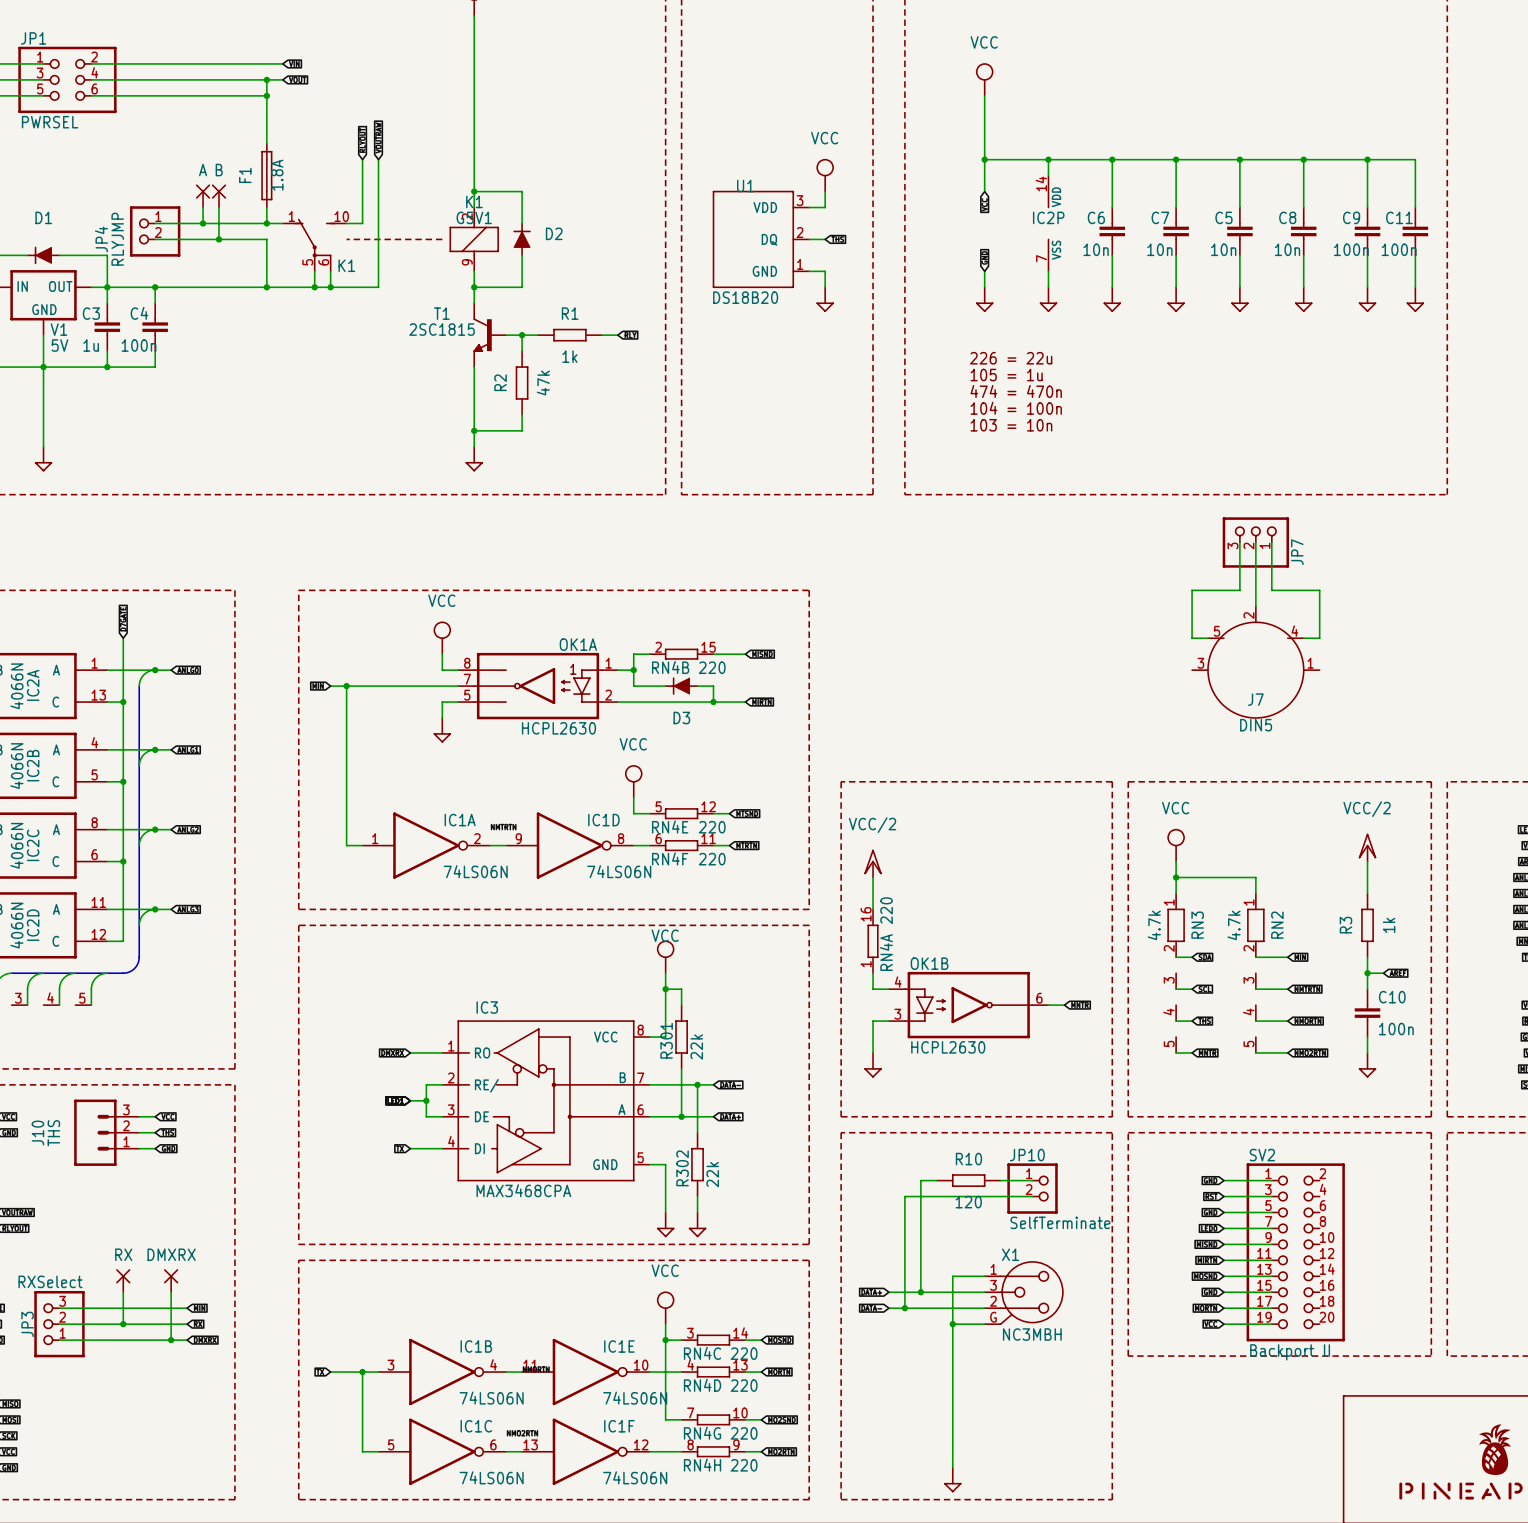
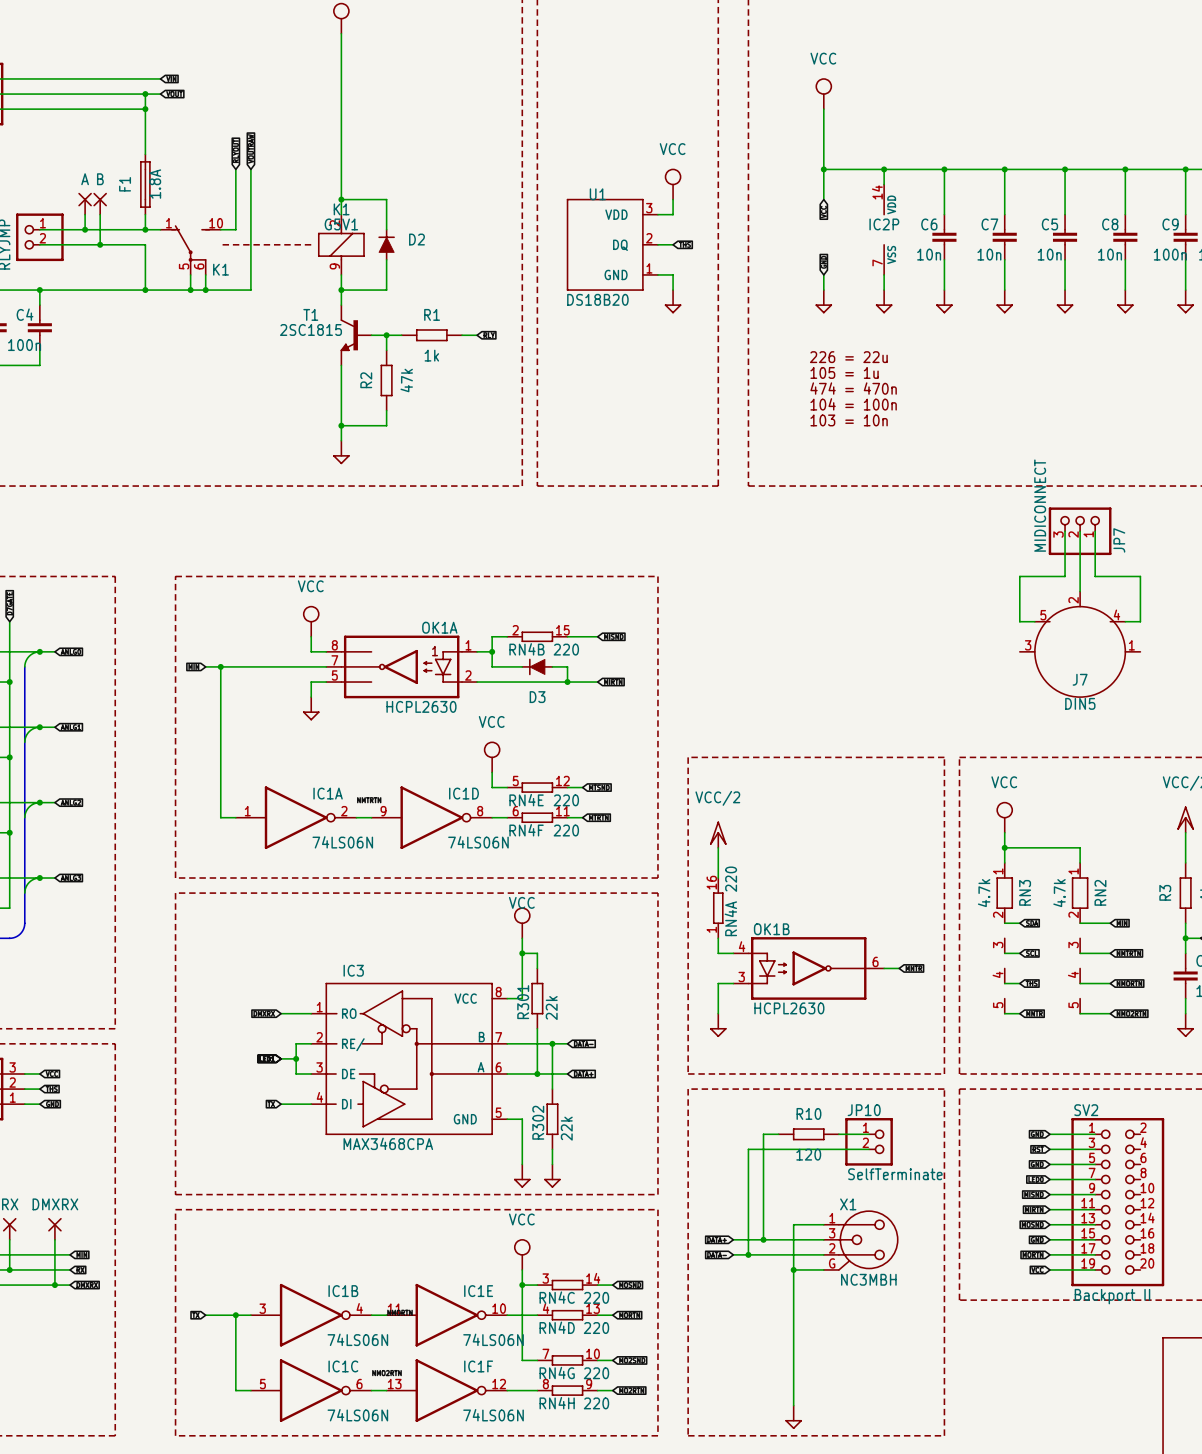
JP7 value: none -> MIDICONNECT (1040, 505)

